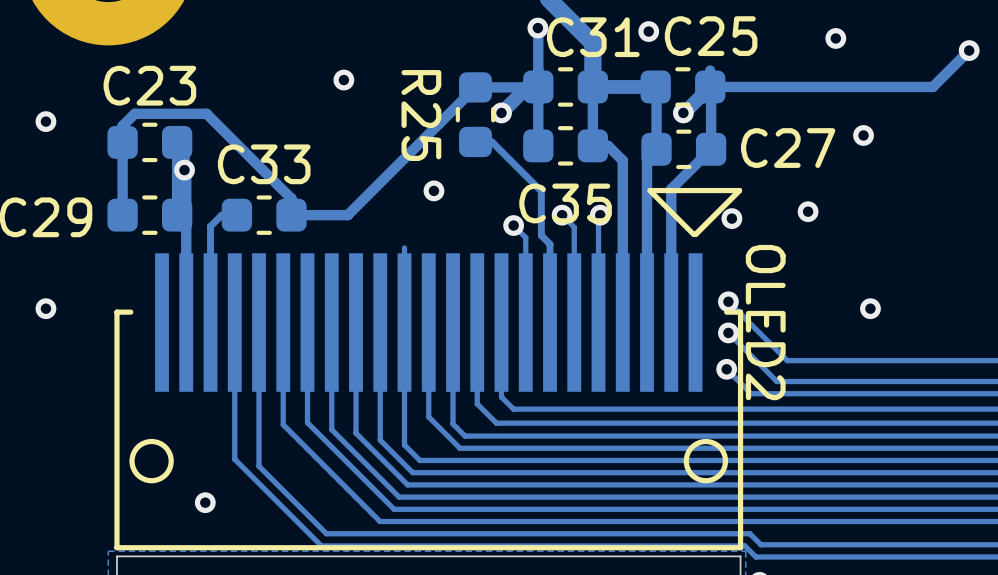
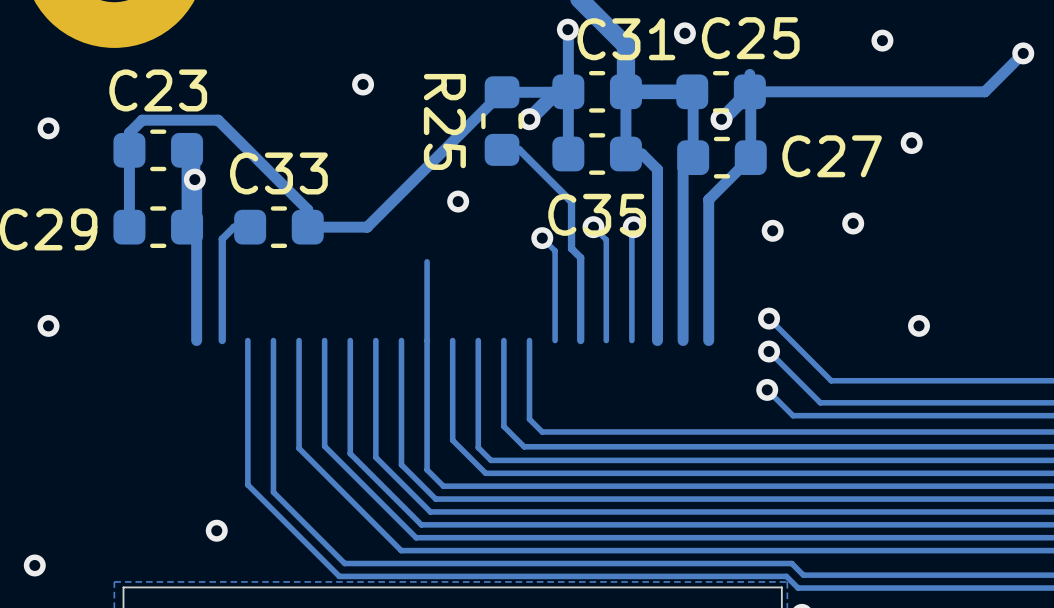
OLED2: (428, 369) -> none
via: none -> (34, 565)

